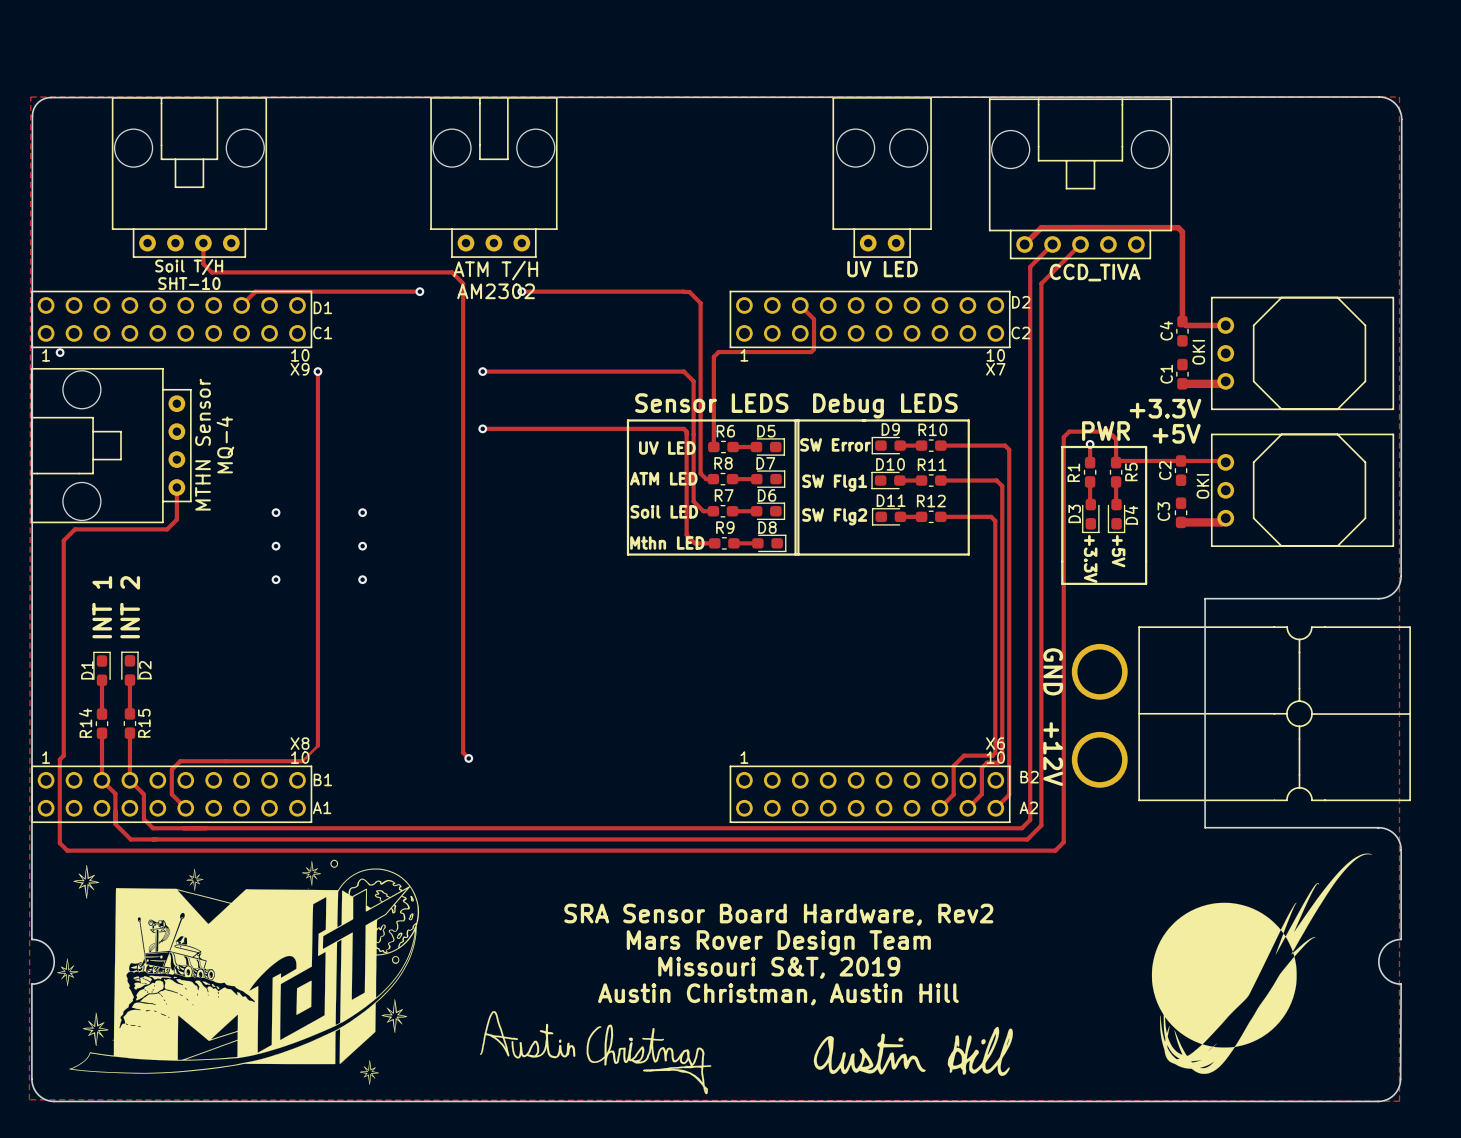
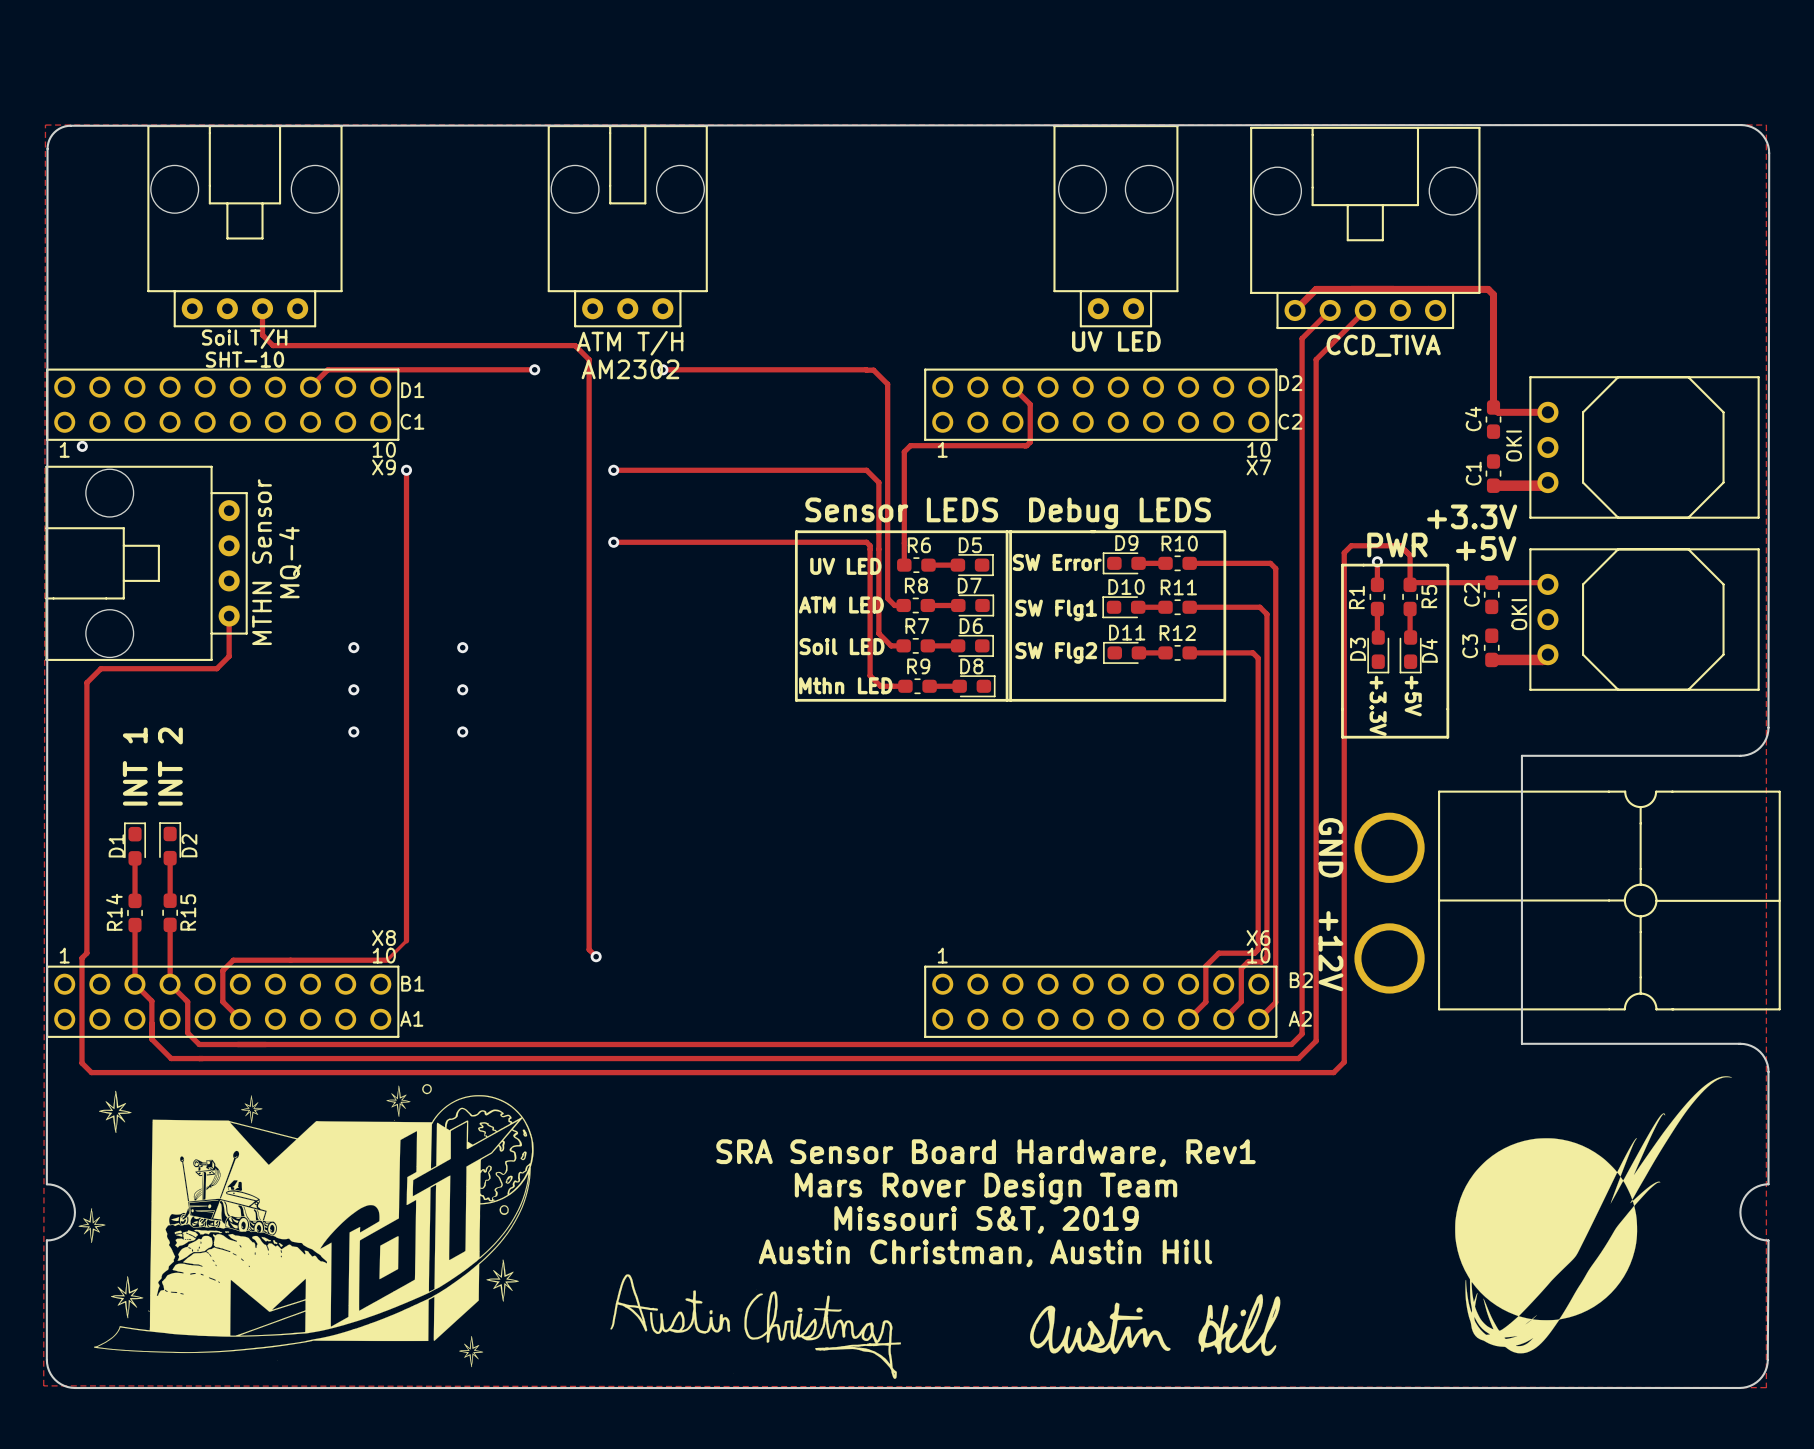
text: SRA Sensor Board Hardware, Rev2 (778, 914) -> SRA Sensor Board Hardware, Rev1 (986, 1153)

